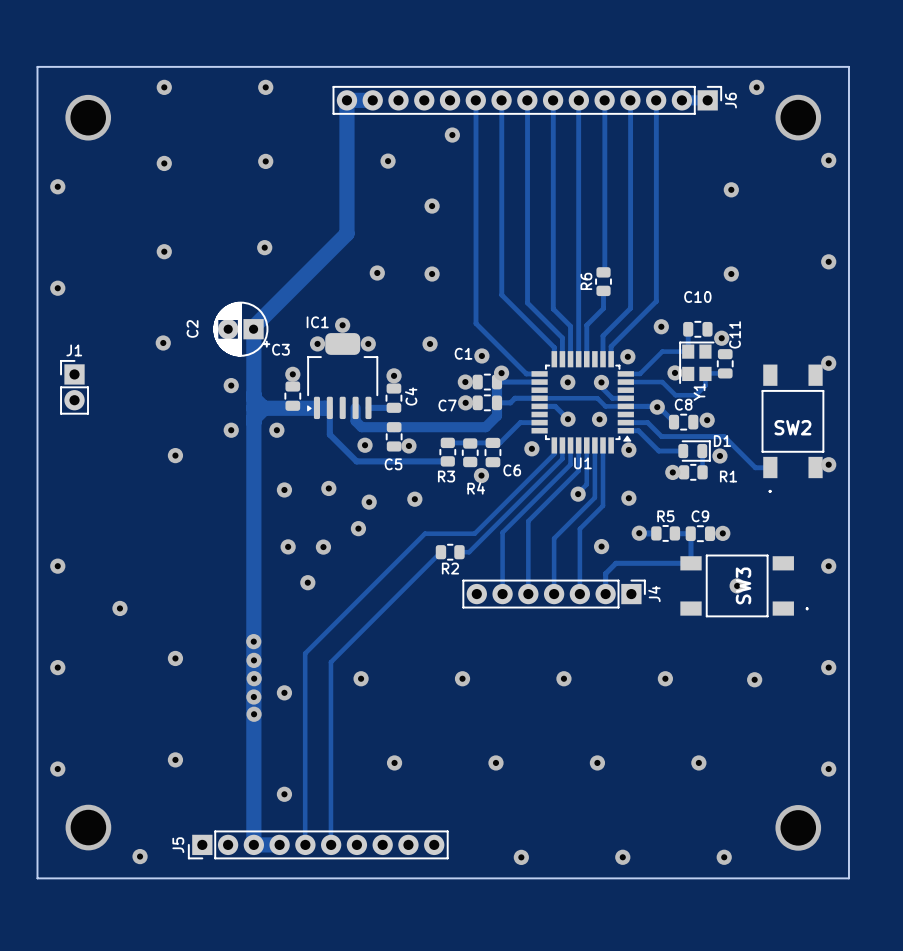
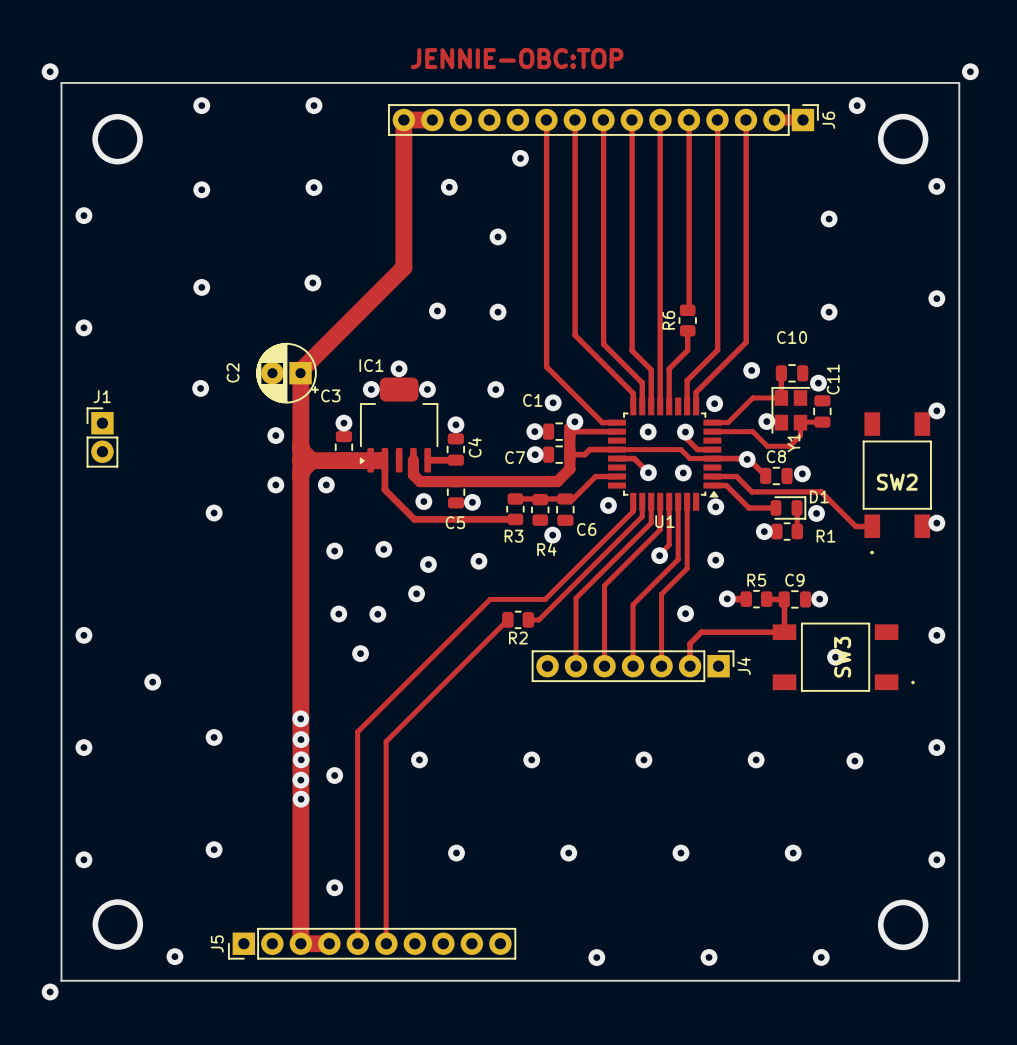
text: none -> JENNIE-OBC:TOP (517, 58)
via: none -> (50, 71)
via: none -> (970, 71)
via: none -> (50, 992)

